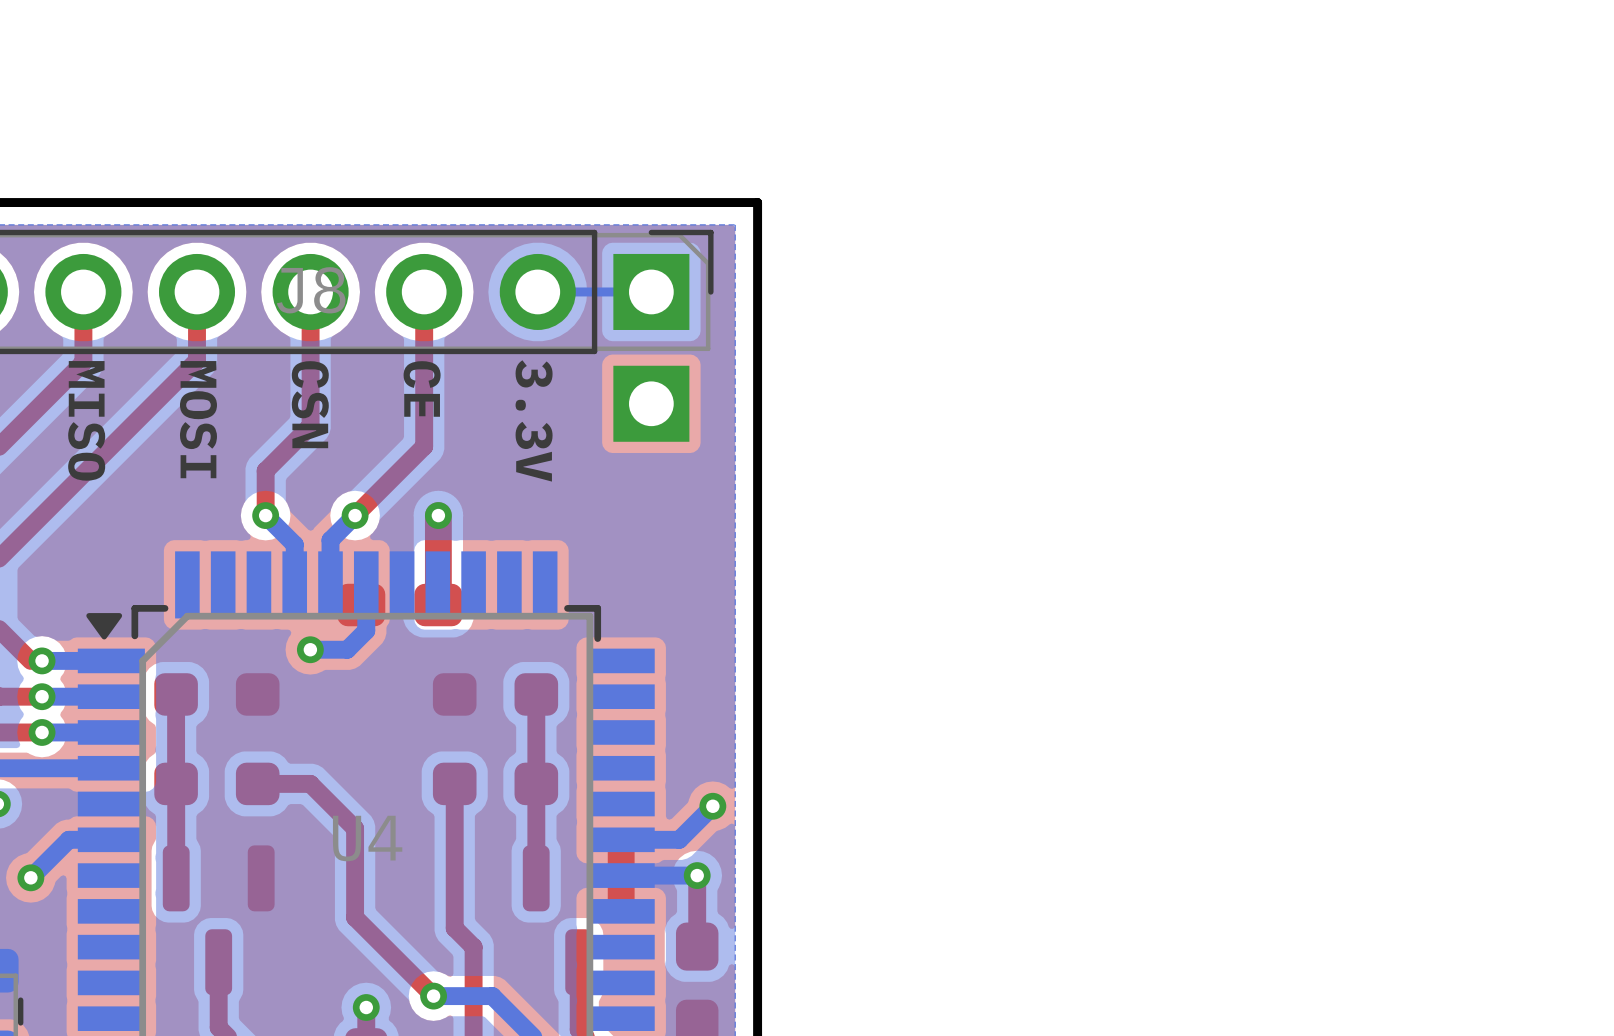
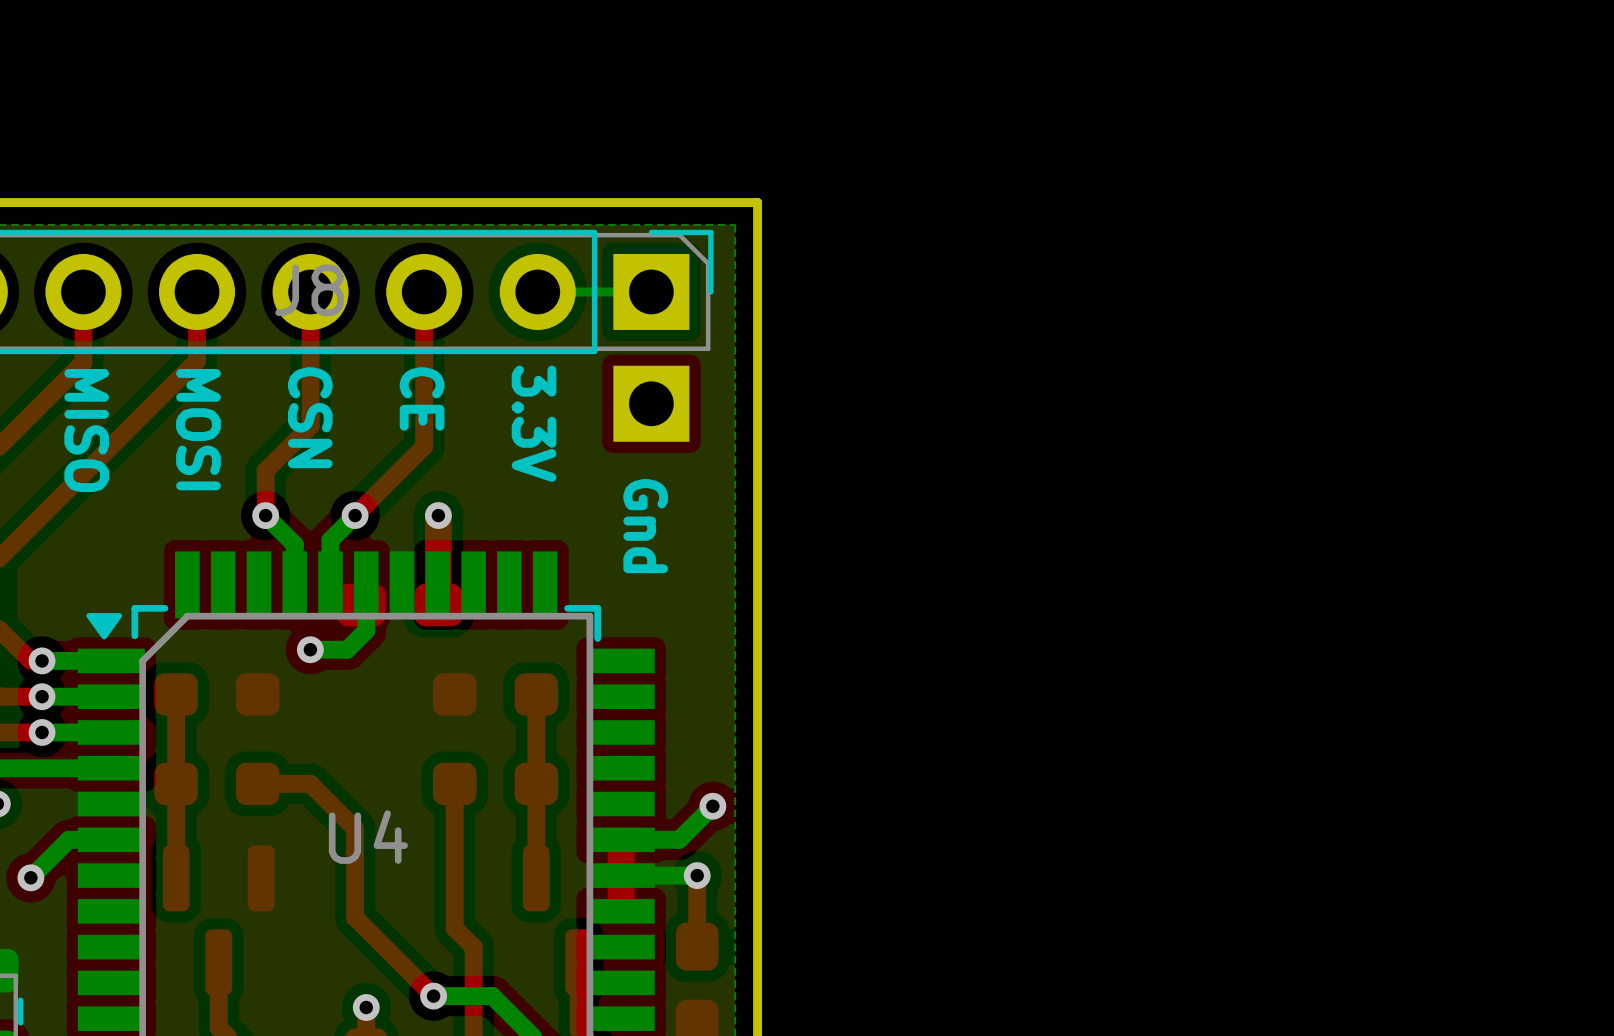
text: none -> Gnd (645, 526)

